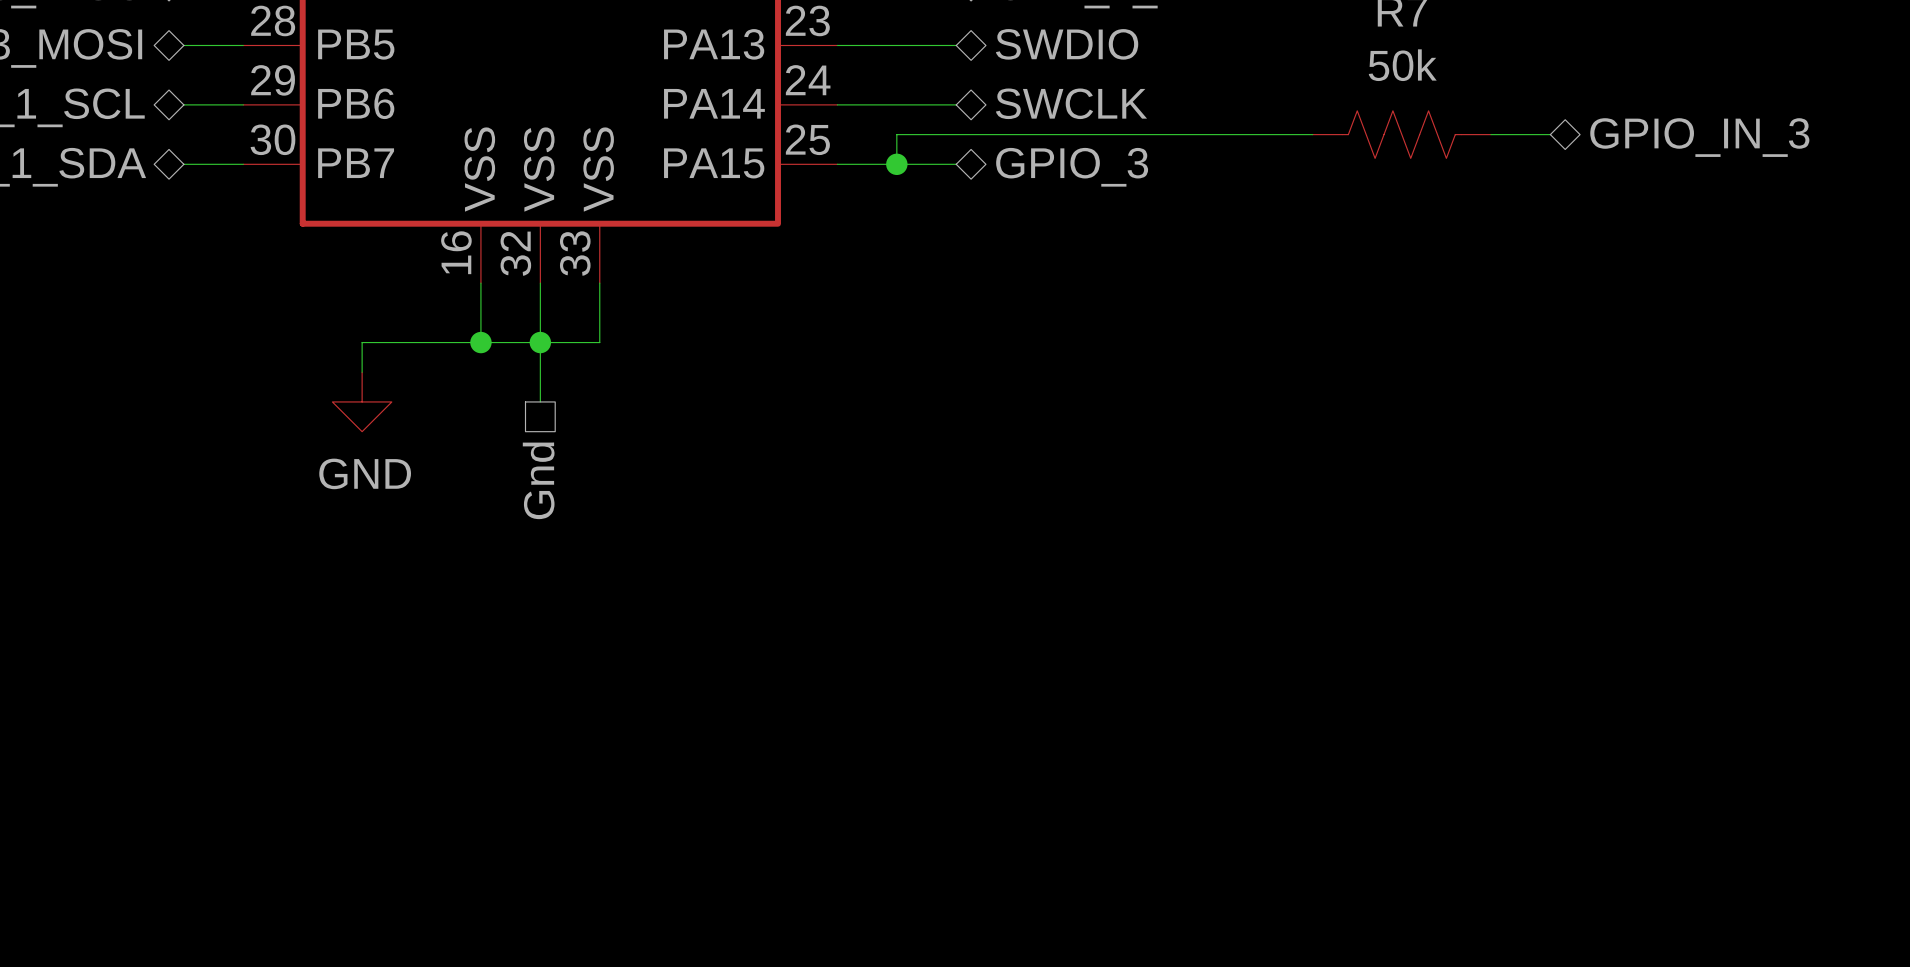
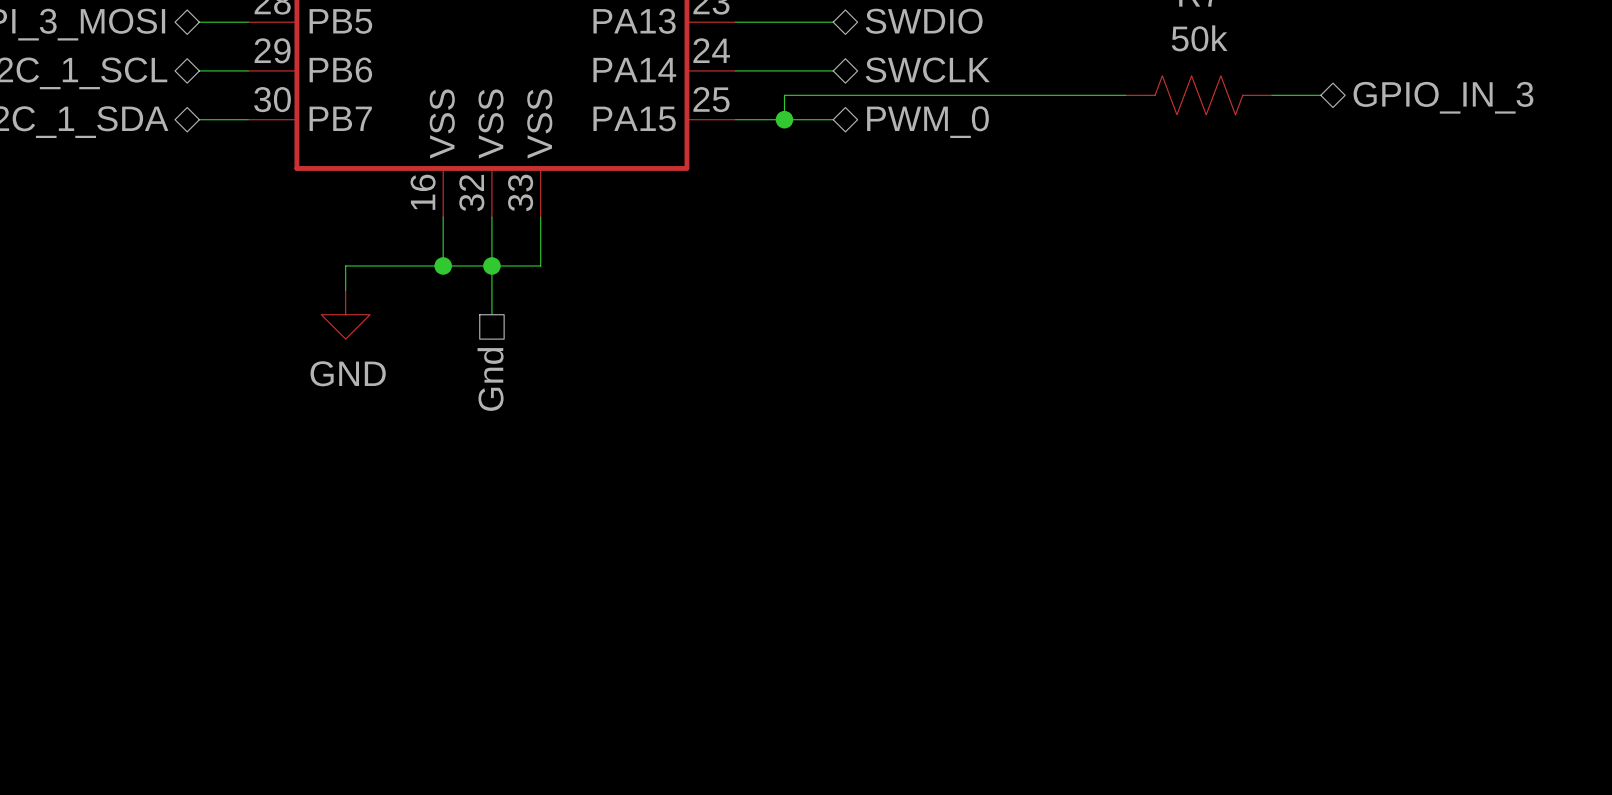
hierarchical label: GPIO_3 (1072, 167) -> PWM_0 (927, 122)

